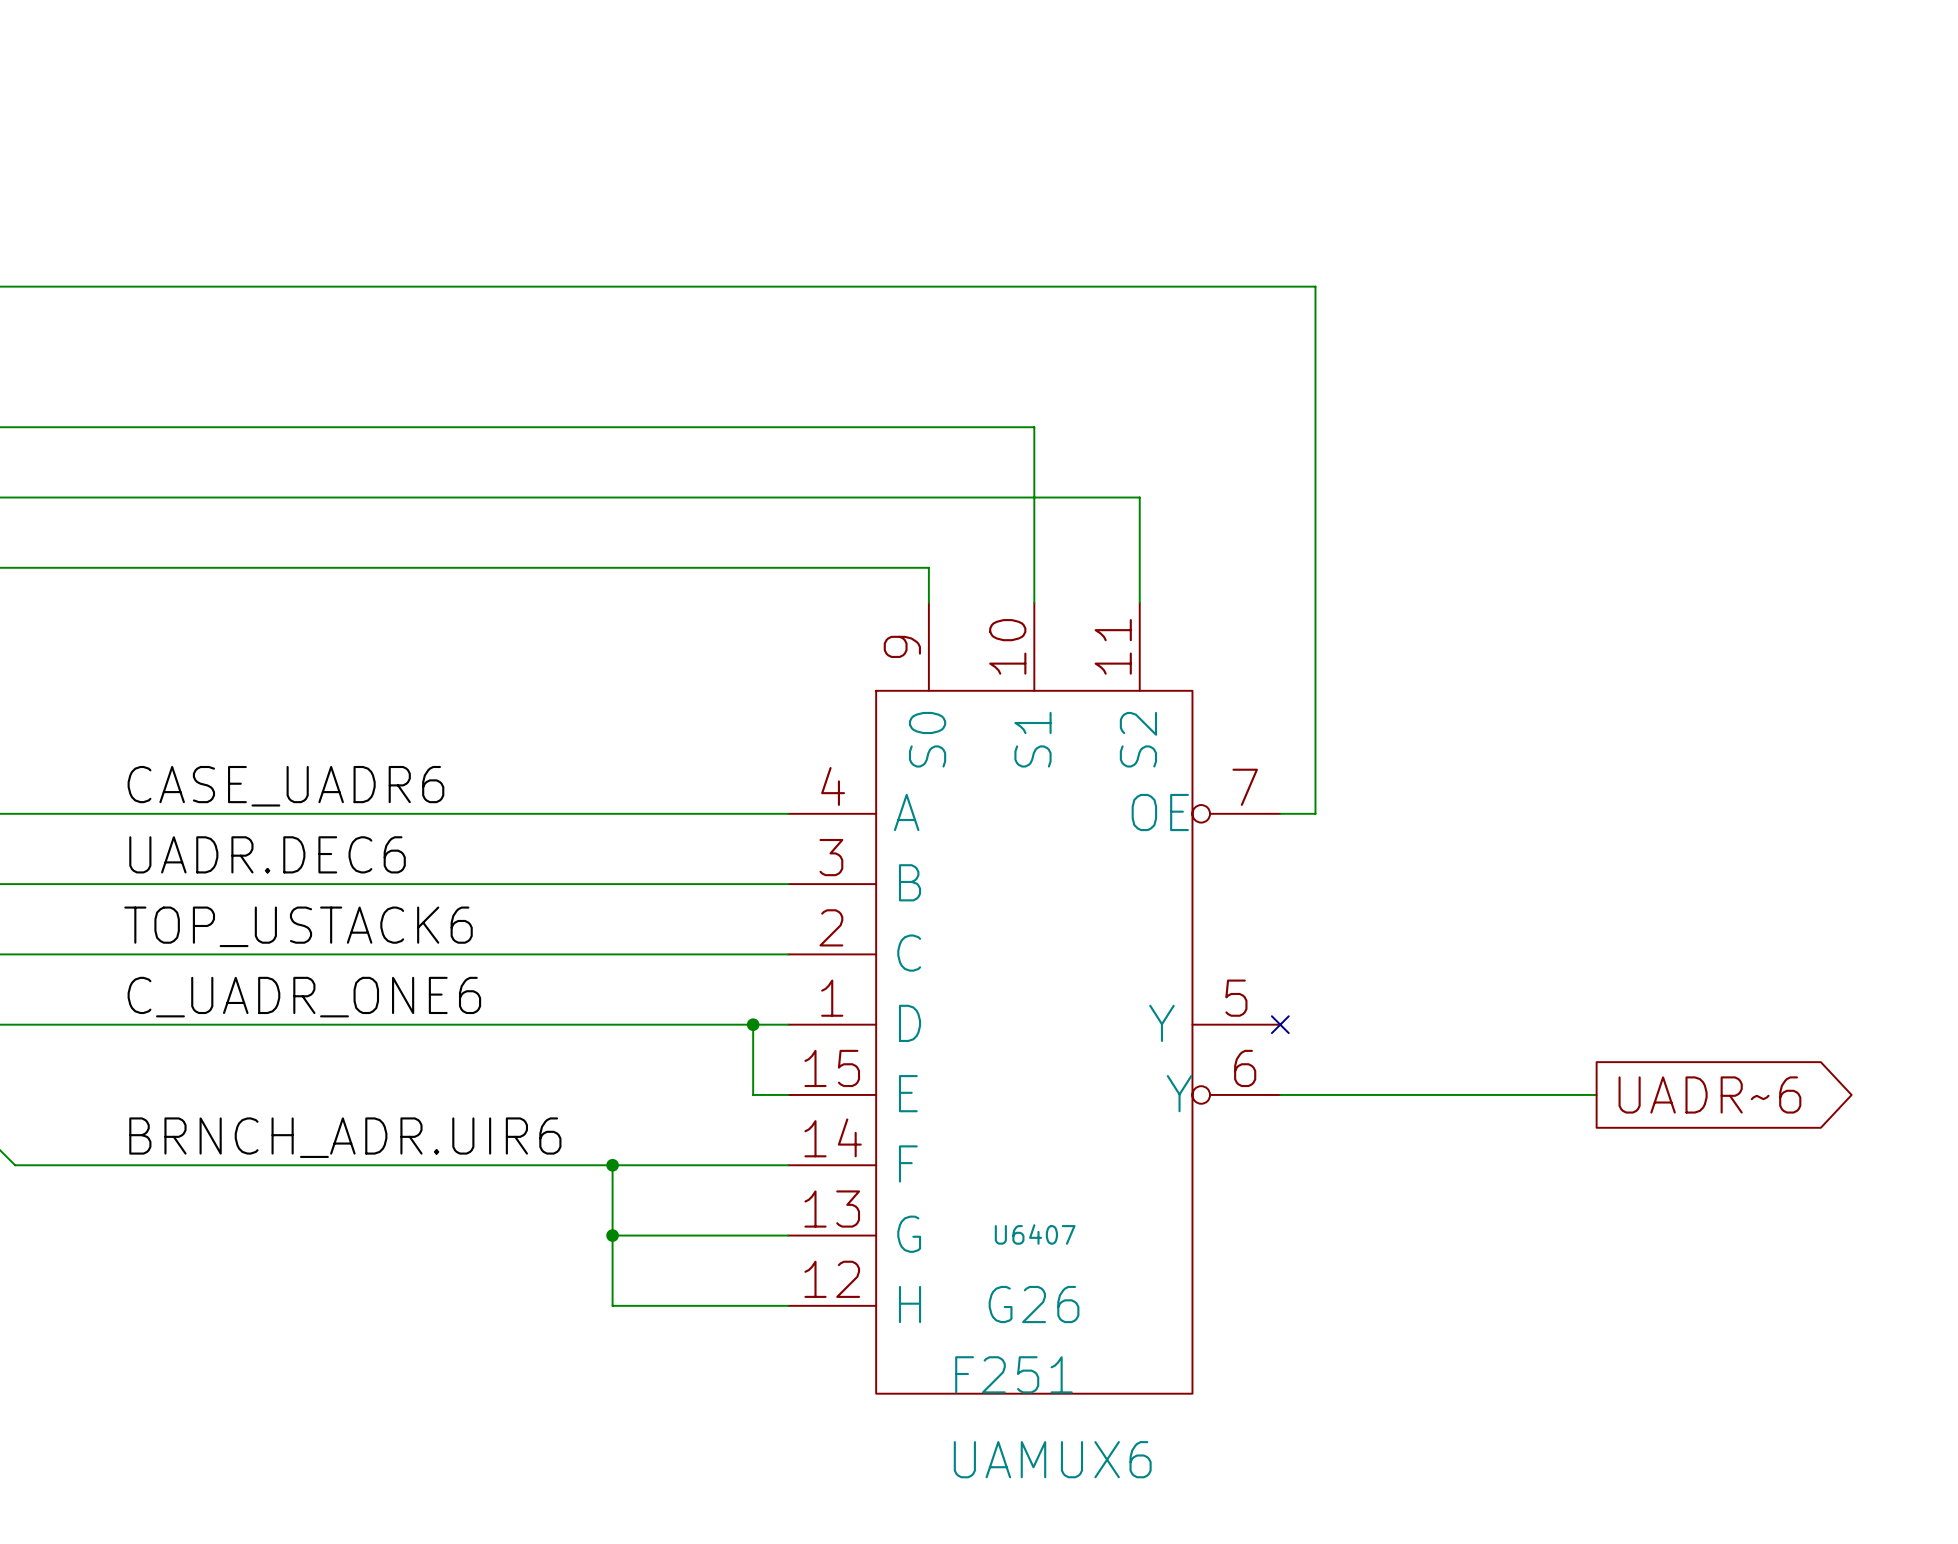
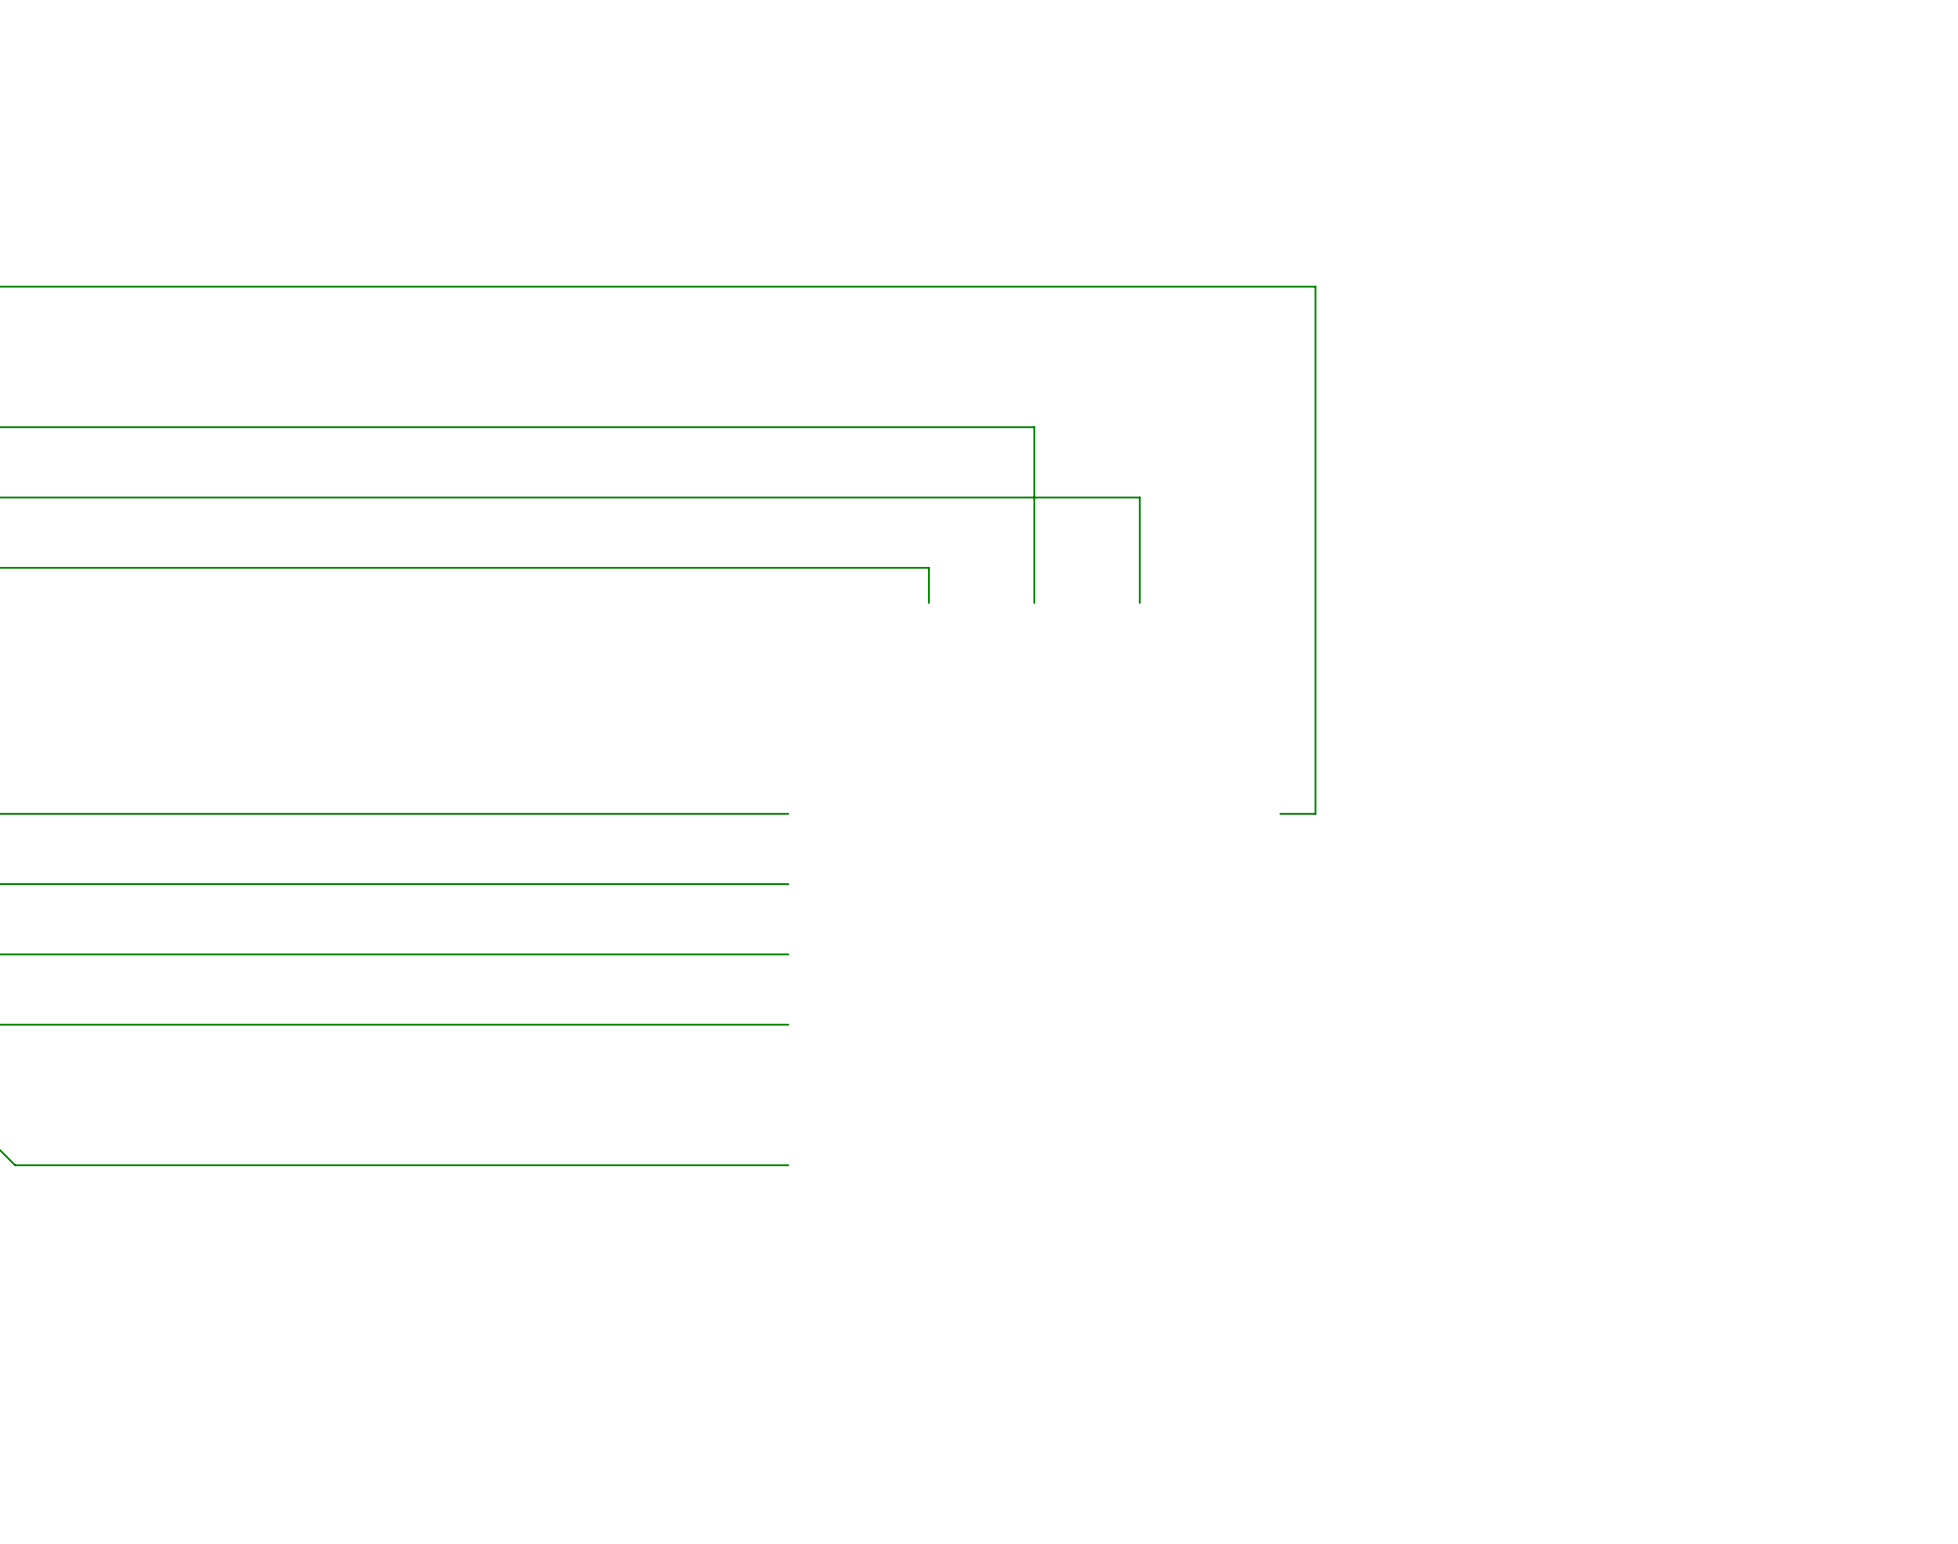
label: CASE_UADR6 (285, 786) -> none
label: UADR.DEC6 (267, 854) -> none
label: TOP_USTACK6 (298, 926) -> none
label: C_UADR_ONE6 (304, 997) -> none
U6407: F251 (1034, 998) -> none
wire: (753, 1024) (753, 1094) (788, 1094) -> none
junction: (753, 1024) -> none
no-connect mark: (1280, 1024) -> none
wire: (1280, 1094) (1596, 1094) -> none
global label: UADR~6 (1709, 1094) -> none
label: BRNCH_ADR.UIR6 (345, 1137) -> none
wire: (612, 1165) (612, 1305) (788, 1305) -> none
junction: (612, 1165) -> none
wire: (612, 1235) (788, 1235) -> none
junction: (612, 1235) -> none

